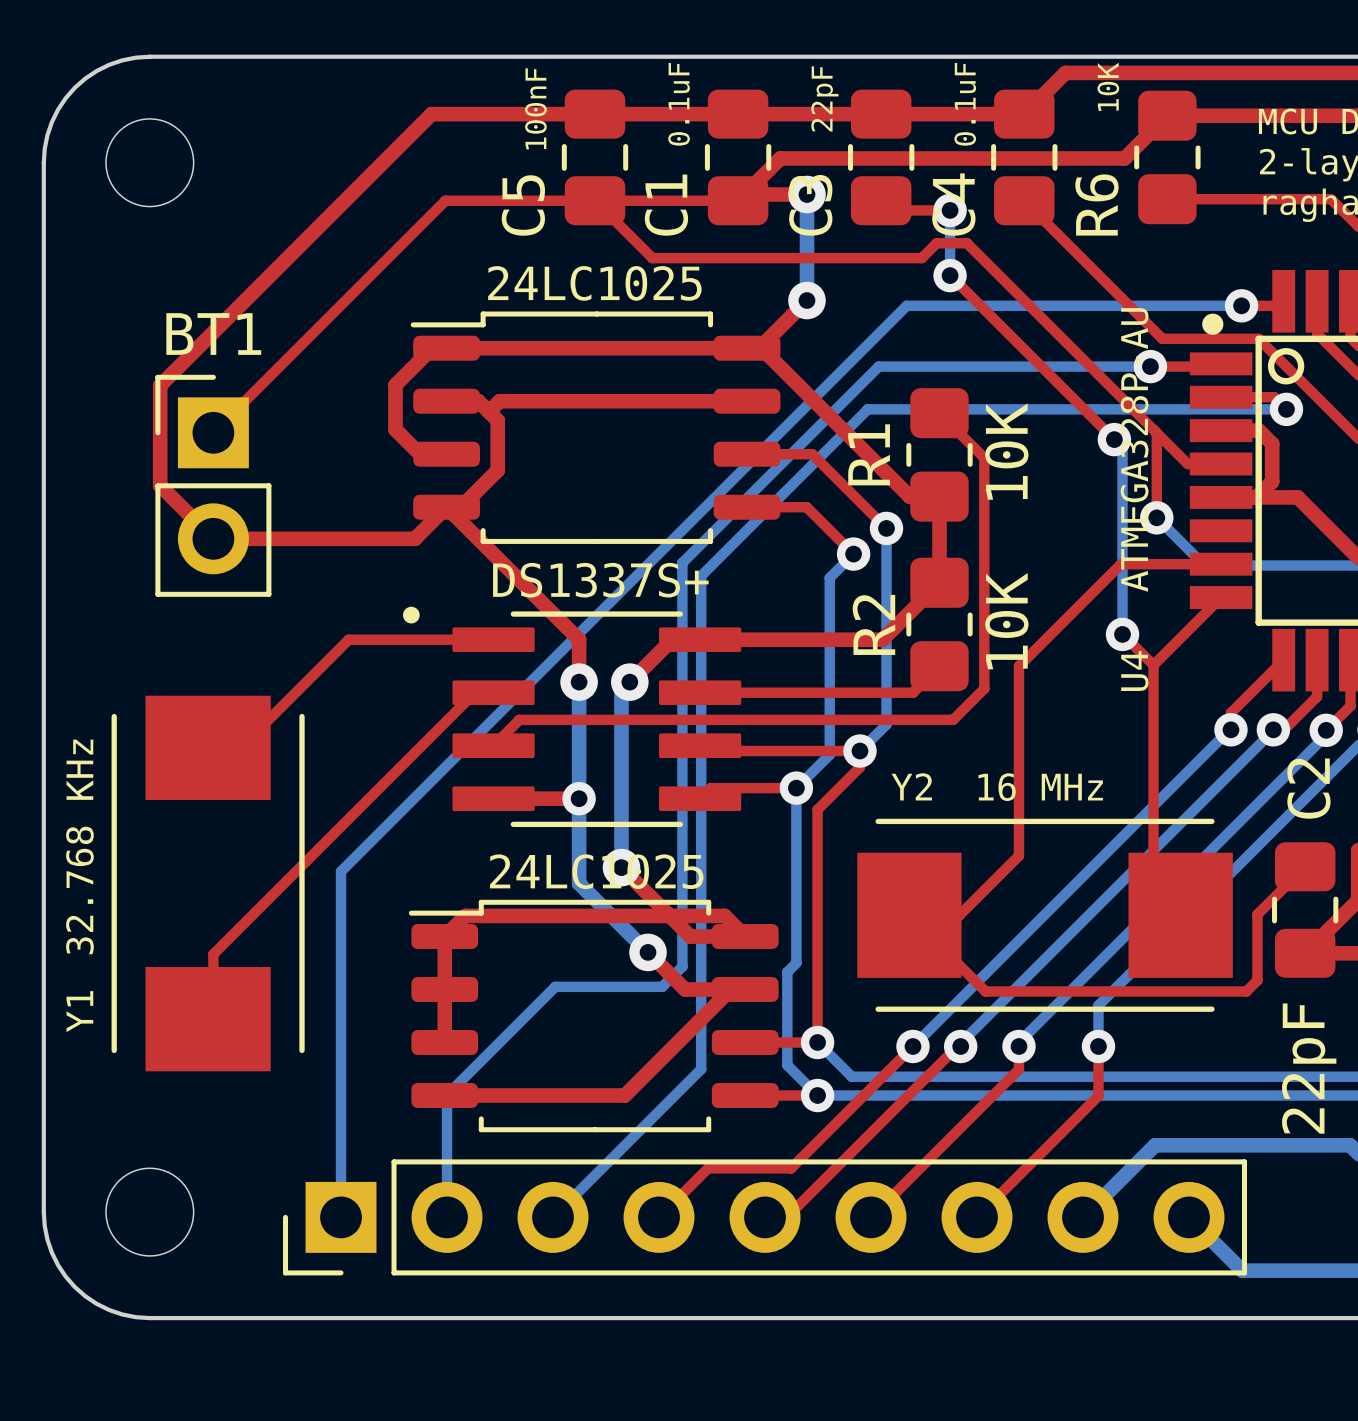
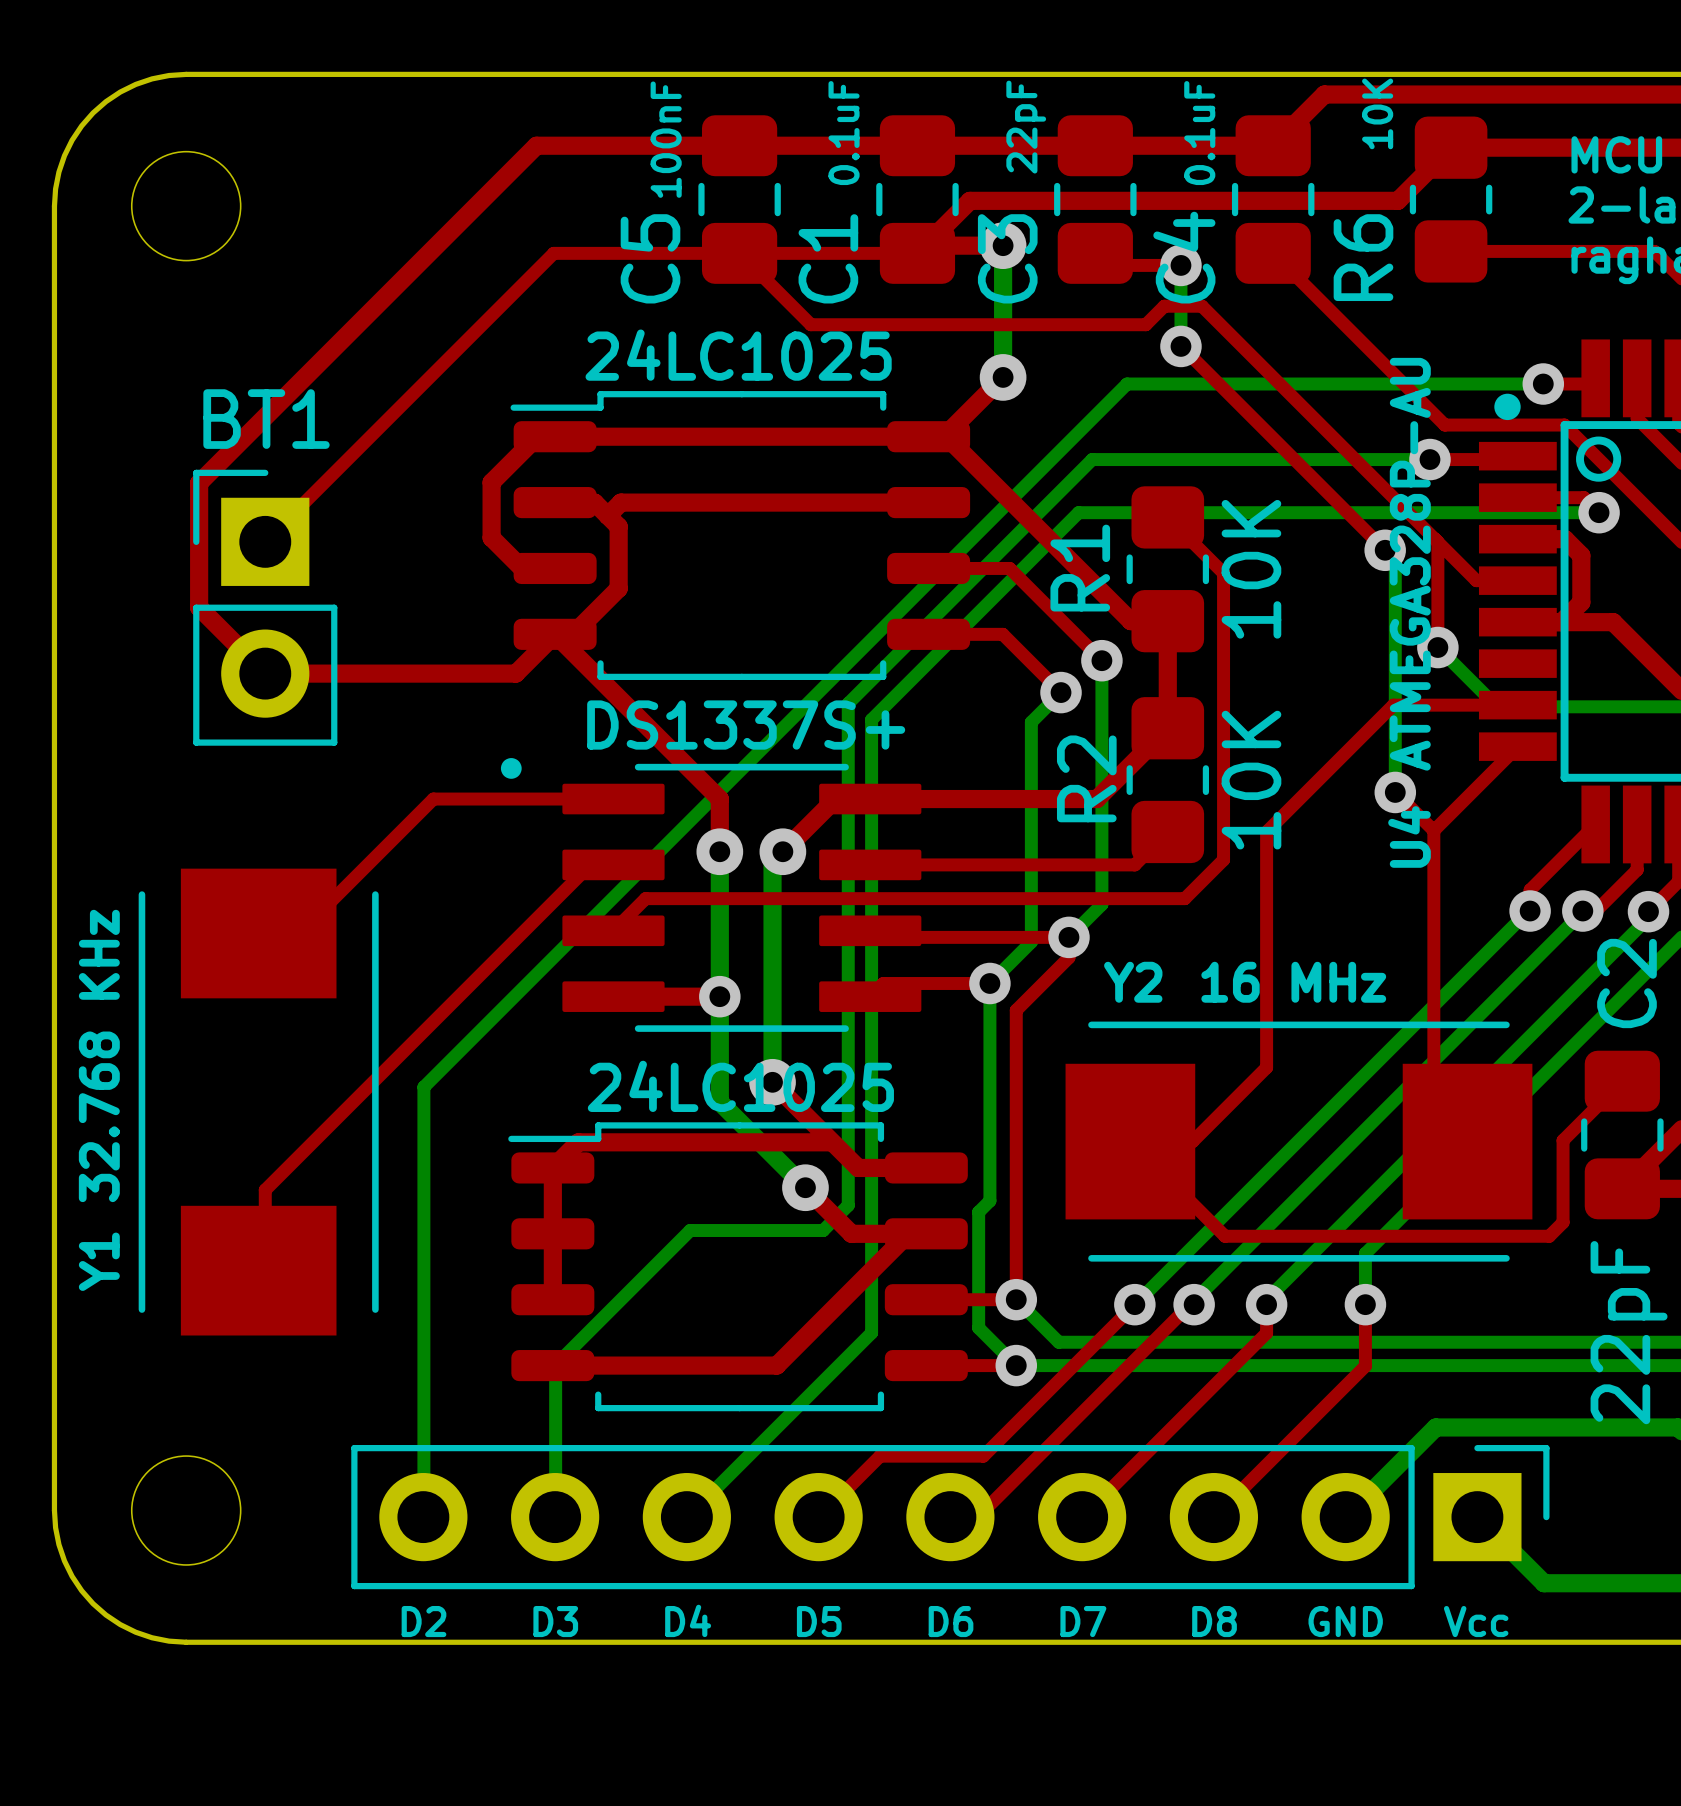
top track: (669, 915) (724, 915) (745, 936) -> none
part rotation: 0° (765, 1217) -> 180° (950, 1517)
text: none -> D2 (423, 1621)
text: none -> D3 (555, 1621)
text: none -> D4 (688, 1620)
text: none -> D5 (819, 1621)
text: none -> D6 (951, 1621)
text: none -> D7 (1083, 1621)
text: none -> D8 (1214, 1621)
text: none -> GND (1345, 1621)
text: none -> Vcc (1476, 1621)

